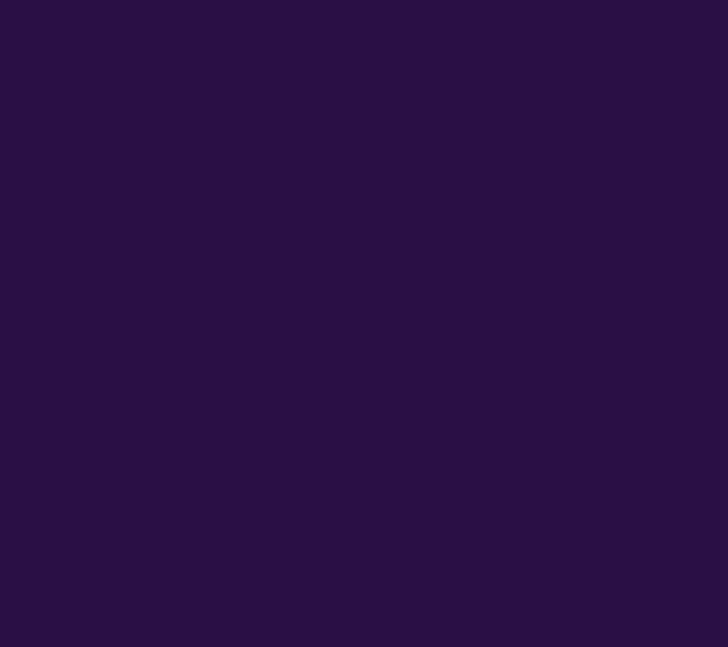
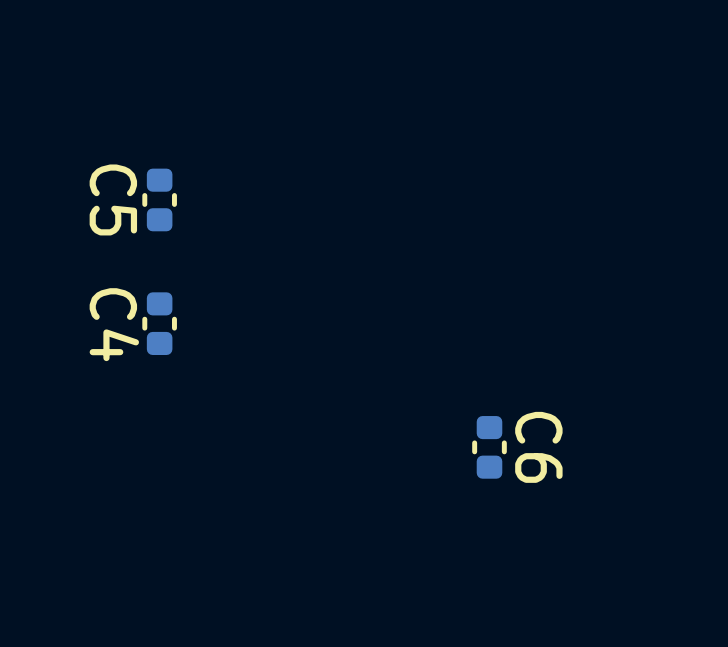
C5: none -> (159, 199)
C4: none -> (159, 323)
C6: none -> (489, 447)

